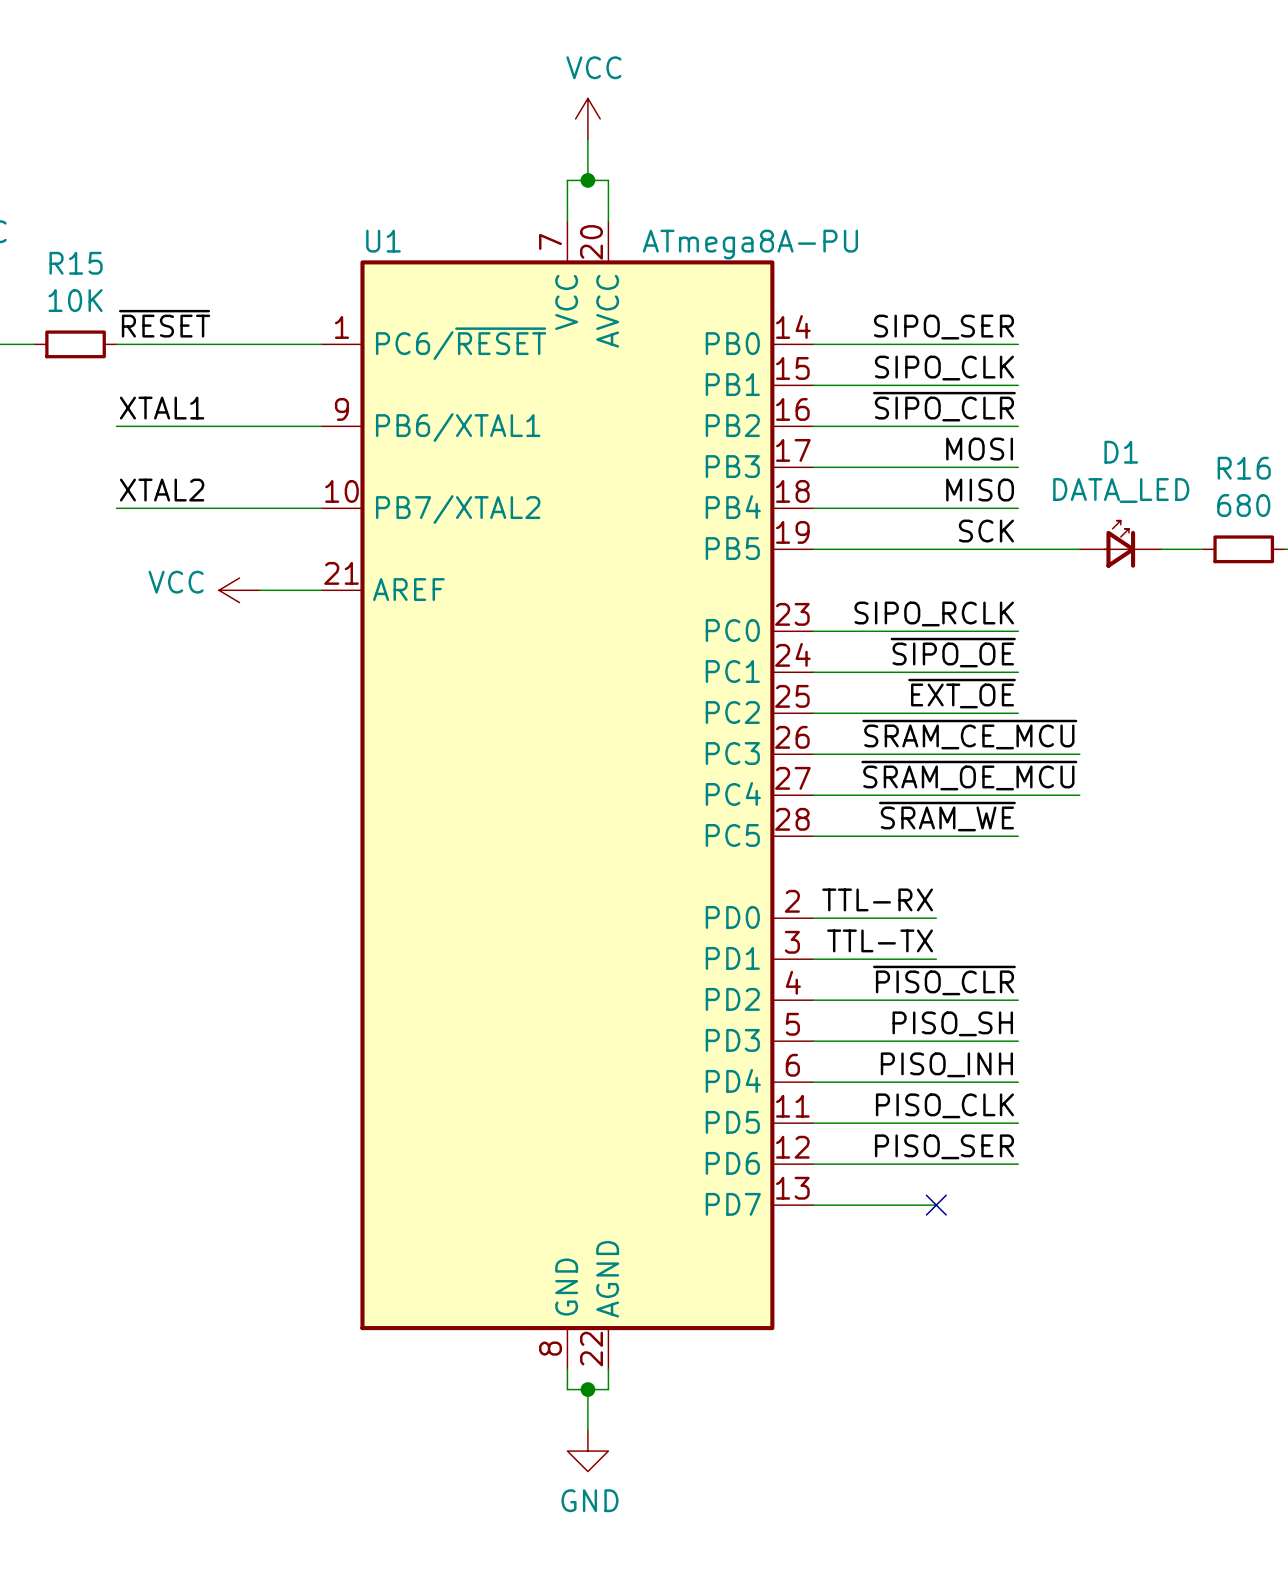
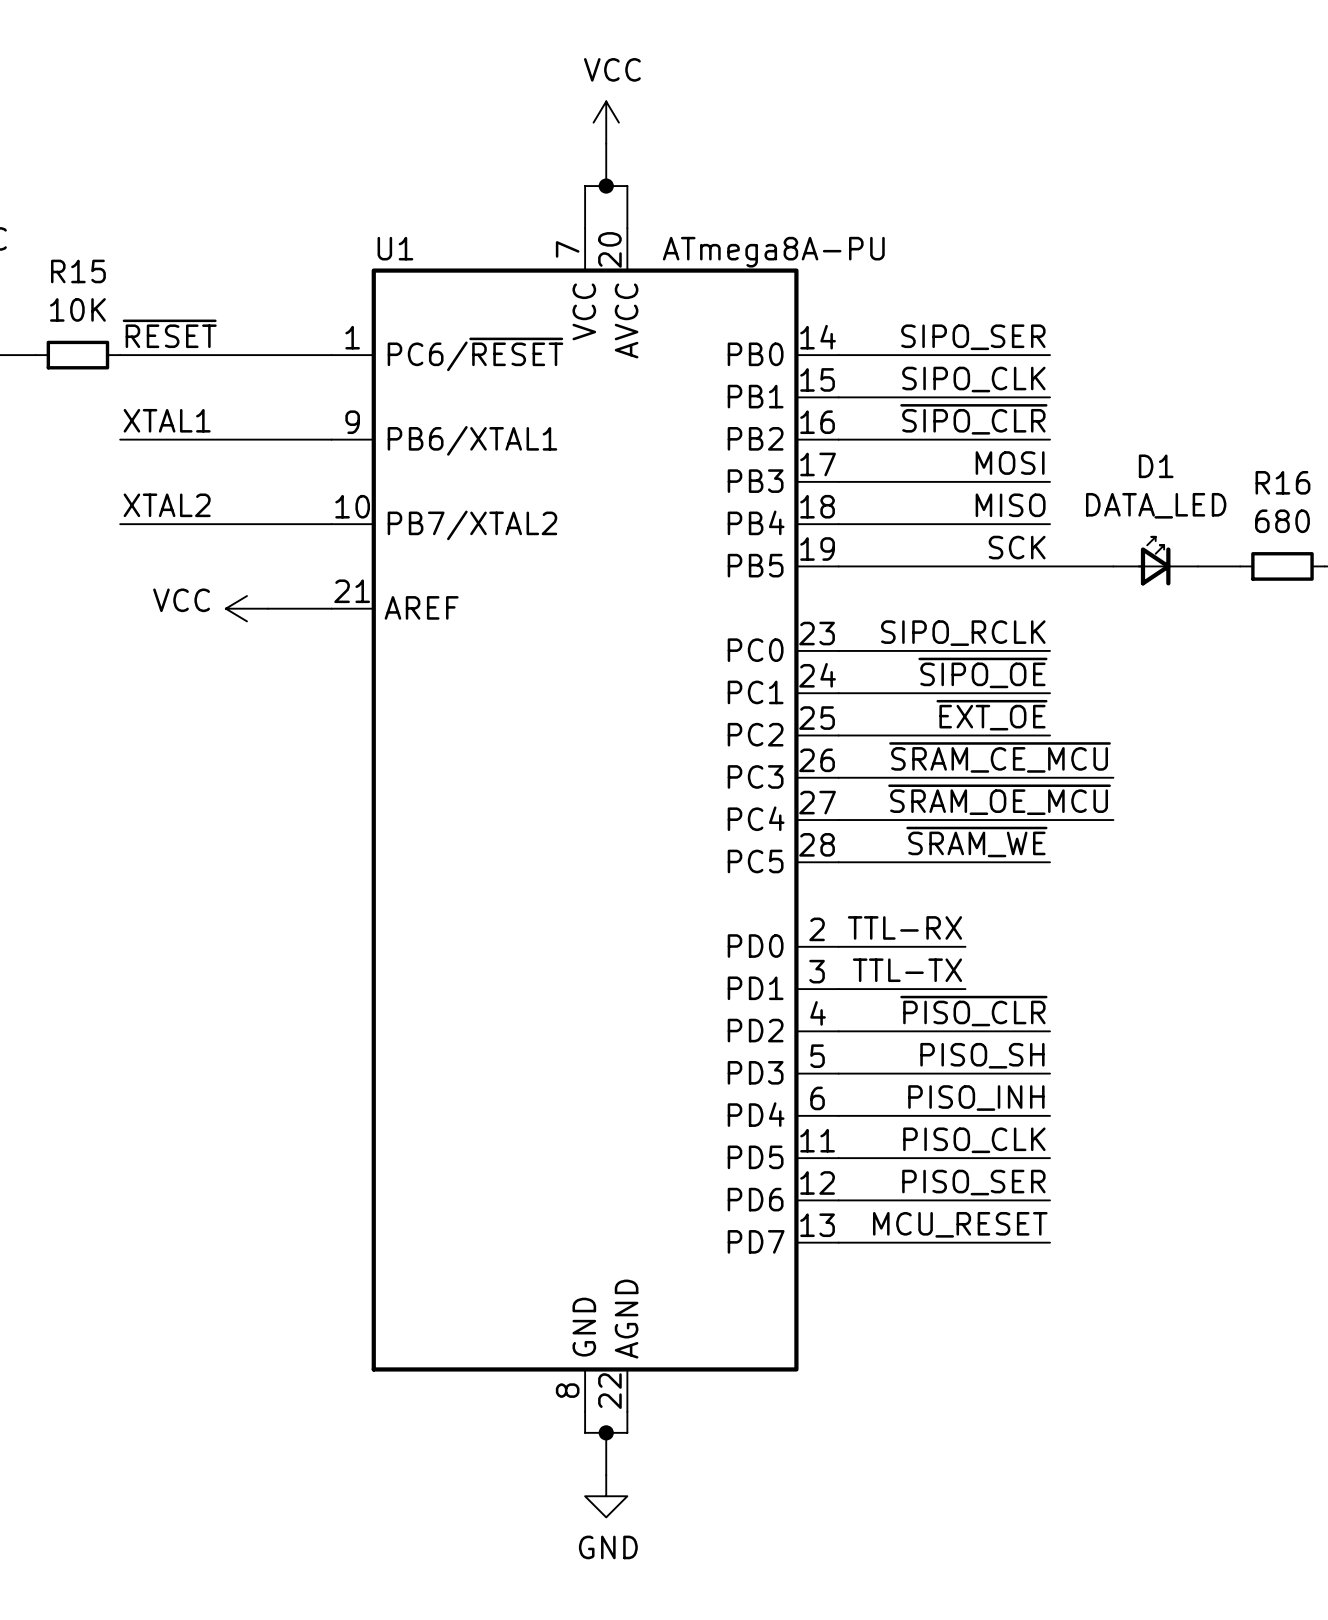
label: none -> MCU_RESET (960, 1224)
wire: none -> (965, 1242) (1050, 1242)
no-connect mark: (936, 1205) -> none

